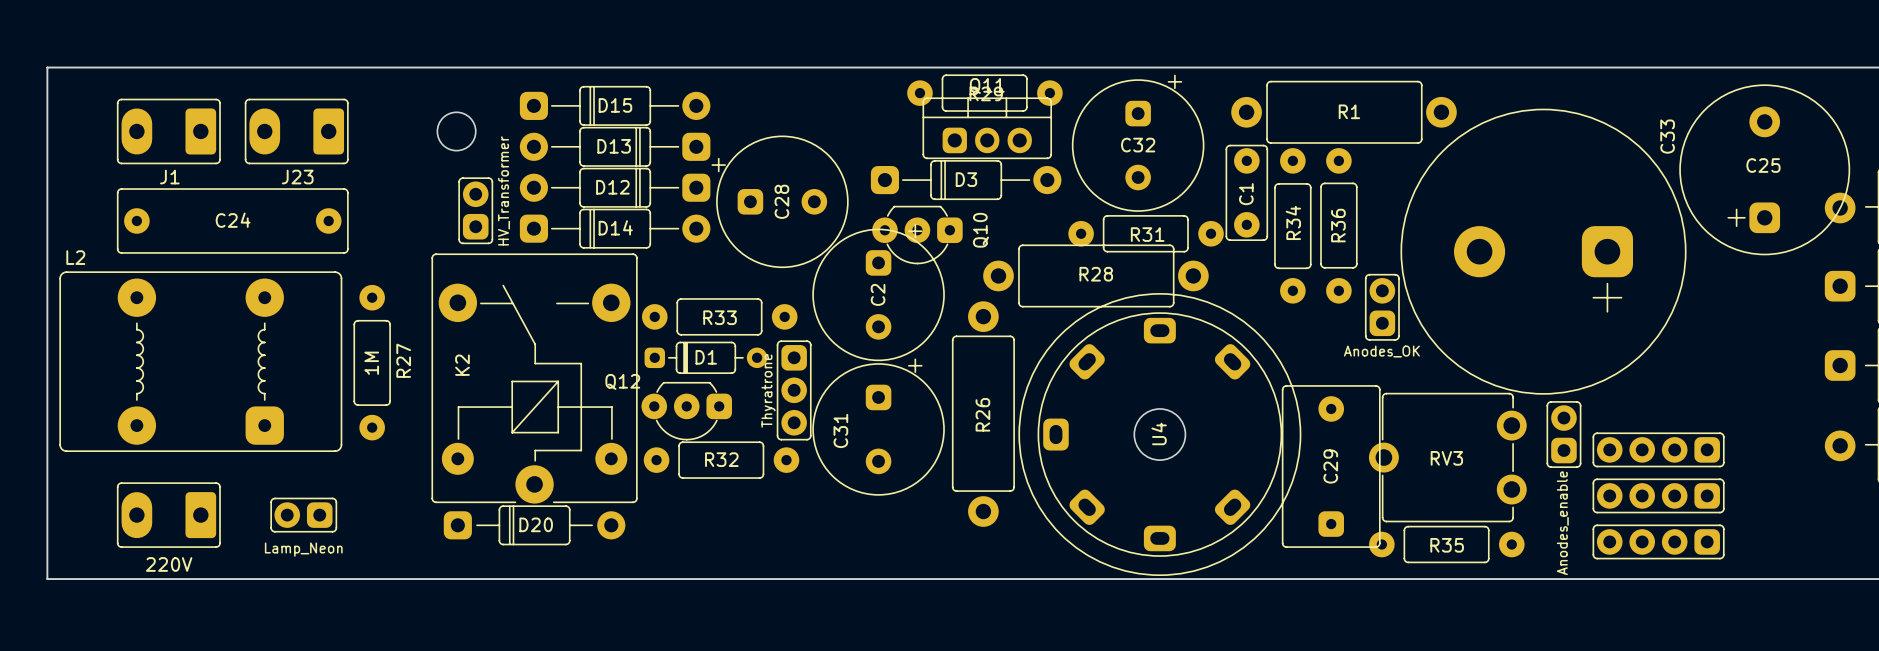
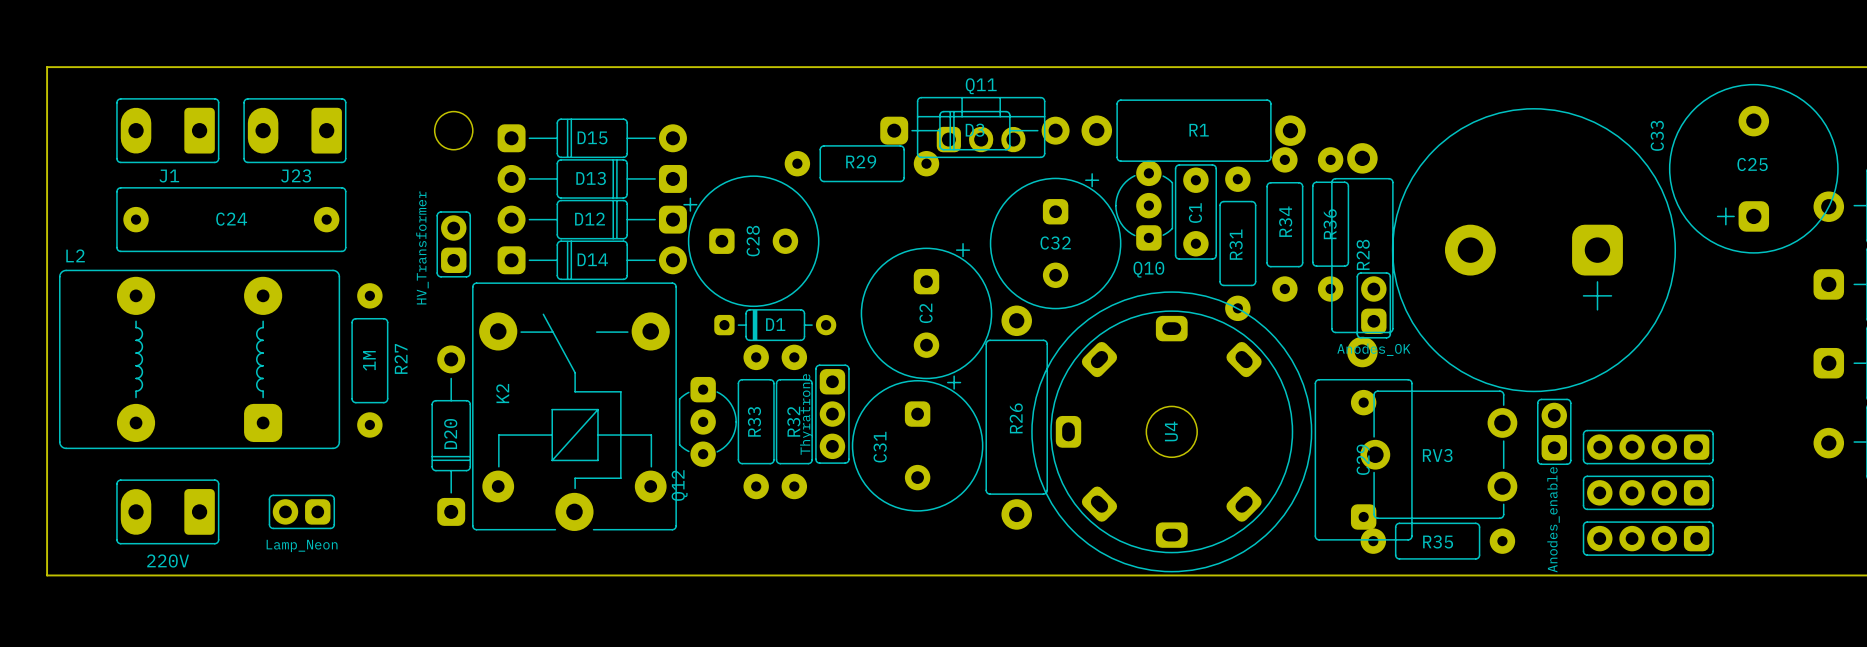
R29 rotation: 0° (984, 93) -> 180° (861, 163)
R29 position: (984, 93) -> (861, 163)
D15 position: (615, 105) -> (592, 138)
R1 position: (1344, 112) -> (1193, 130)
C32 position: (1138, 143) -> (1055, 241)
D13 position: (615, 146) -> (592, 178)
D3 position: (966, 180) -> (974, 130)
D12 position: (615, 187) -> (592, 219)
part value position: HV_Transformer (503, 190) -> HV_Transformer (422, 247)
C1 position: (1246, 192) -> (1195, 211)
C28 position: (780, 201) -> (751, 241)
part position: (475, 210) -> (453, 244)
D14 position: (615, 228) -> (592, 260)
R31 rotation: 0° (1146, 233) -> 90° clockwise (1237, 243)
R31 position: (1146, 233) -> (1237, 243)
Q10 rotation: 0° (917, 235) -> 90° clockwise (1144, 205)
Q10 position: (917, 235) -> (1144, 205)
R28 rotation: 0° (1095, 275) -> 90° clockwise (1362, 255)
R28 position: (1095, 275) -> (1362, 255)
C2 position: (878, 292) -> (926, 311)
R33 rotation: 0° (719, 316) -> 90° clockwise (756, 421)
R33 position: (719, 316) -> (756, 421)
D1 position: (705, 357) -> (775, 325)
K2 position: (534, 378) -> (574, 406)
part position: (794, 390) -> (832, 414)
Q12 rotation: 0° (686, 411) -> 90° counterclockwise (707, 421)
R26 position: (983, 414) -> (1016, 417)
C31 position: (878, 427) -> (917, 443)
U4 position: (1159, 434) -> (1171, 431)
R32 rotation: 0° (721, 460) -> 90° clockwise (794, 421)
C29 position: (1331, 466) -> (1363, 459)
D20 rotation: 0° (534, 525) -> 90° counterclockwise (451, 435)
D20 position: (534, 525) -> (451, 435)

